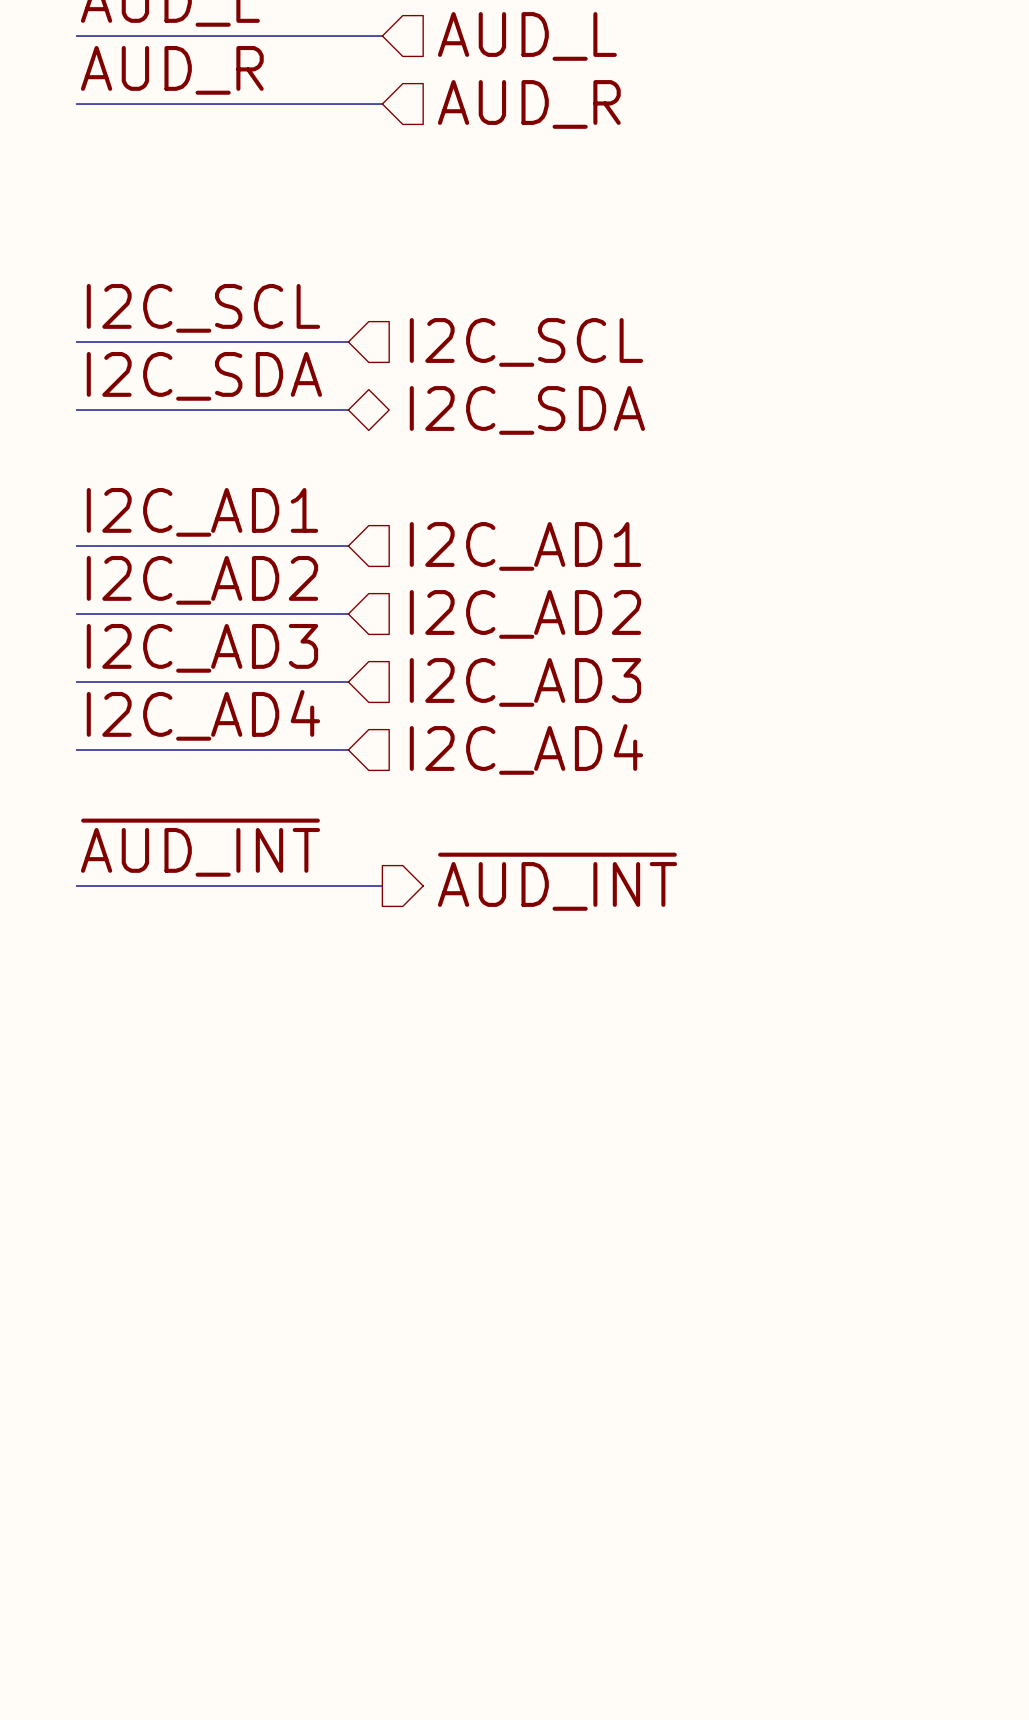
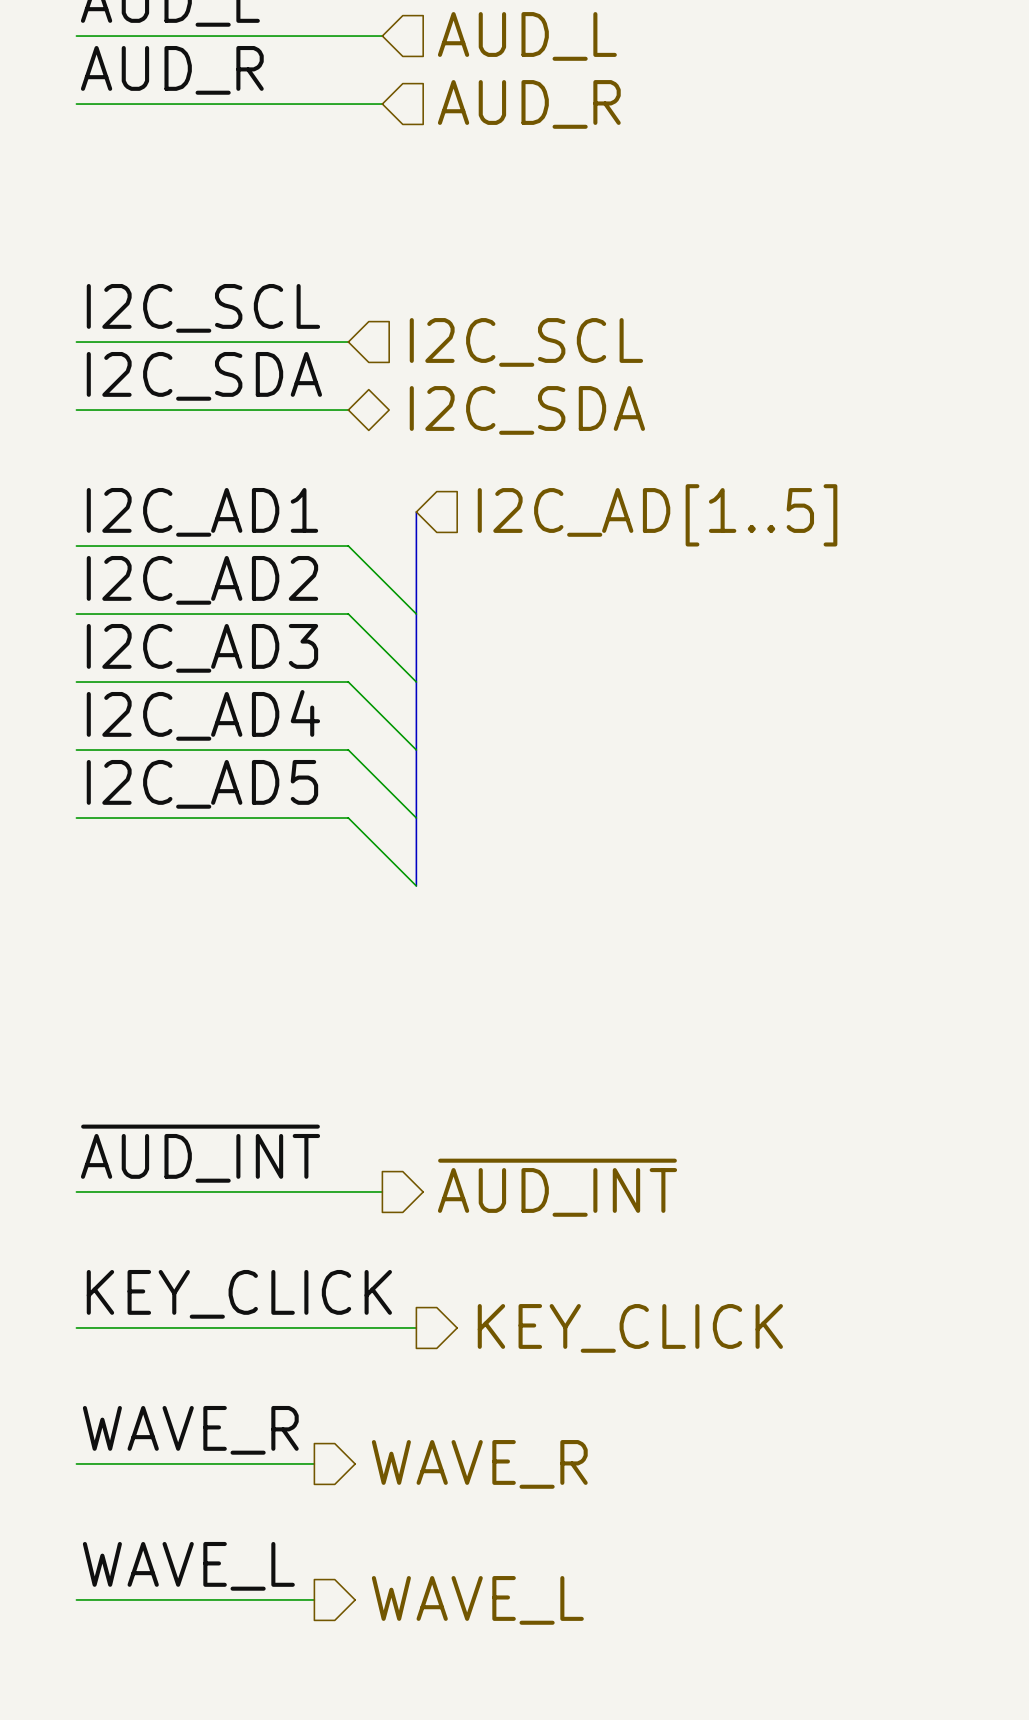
bus: none -> (416, 512) (416, 886)
wire: none -> (348, 546) (416, 614)
hierarchical label: I2C_AD1 (525, 546) -> I2C_AD[1..5] (657, 515)
wire: none -> (348, 614) (416, 682)
hierarchical label: I2C_AD2 (525, 614) -> none
wire: none -> (348, 682) (416, 750)
hierarchical label: I2C_AD3 (525, 682) -> none
hierarchical label: I2C_AD4 (526, 749) -> none
wire: none -> (348, 750) (416, 818)
label: none -> I2C_AD5 (202, 784)
wire: none -> (76, 818) (348, 818) (416, 886)
label position: ~{AUD_INT} (200, 847) -> ~{AUD_INT} (200, 1153)
hierarchical label position: ~{AUD_INT} (557, 881) -> ~{AUD_INT} (557, 1187)
wire: (76, 886) (382, 886) -> (76, 1191) (382, 1191)
label: none -> KEY_CLICK (239, 1294)
wire: none -> (76, 1327) (416, 1327)
hierarchical label: none -> KEY_CLICK (630, 1328)
label: none -> WAVE_R (190, 1430)
wire: none -> (76, 1463) (314, 1463)
hierarchical label: none -> WAVE_R (479, 1464)
label: none -> WAVE_L (188, 1566)
wire: none -> (76, 1599) (314, 1599)
hierarchical label: none -> WAVE_L (477, 1600)

